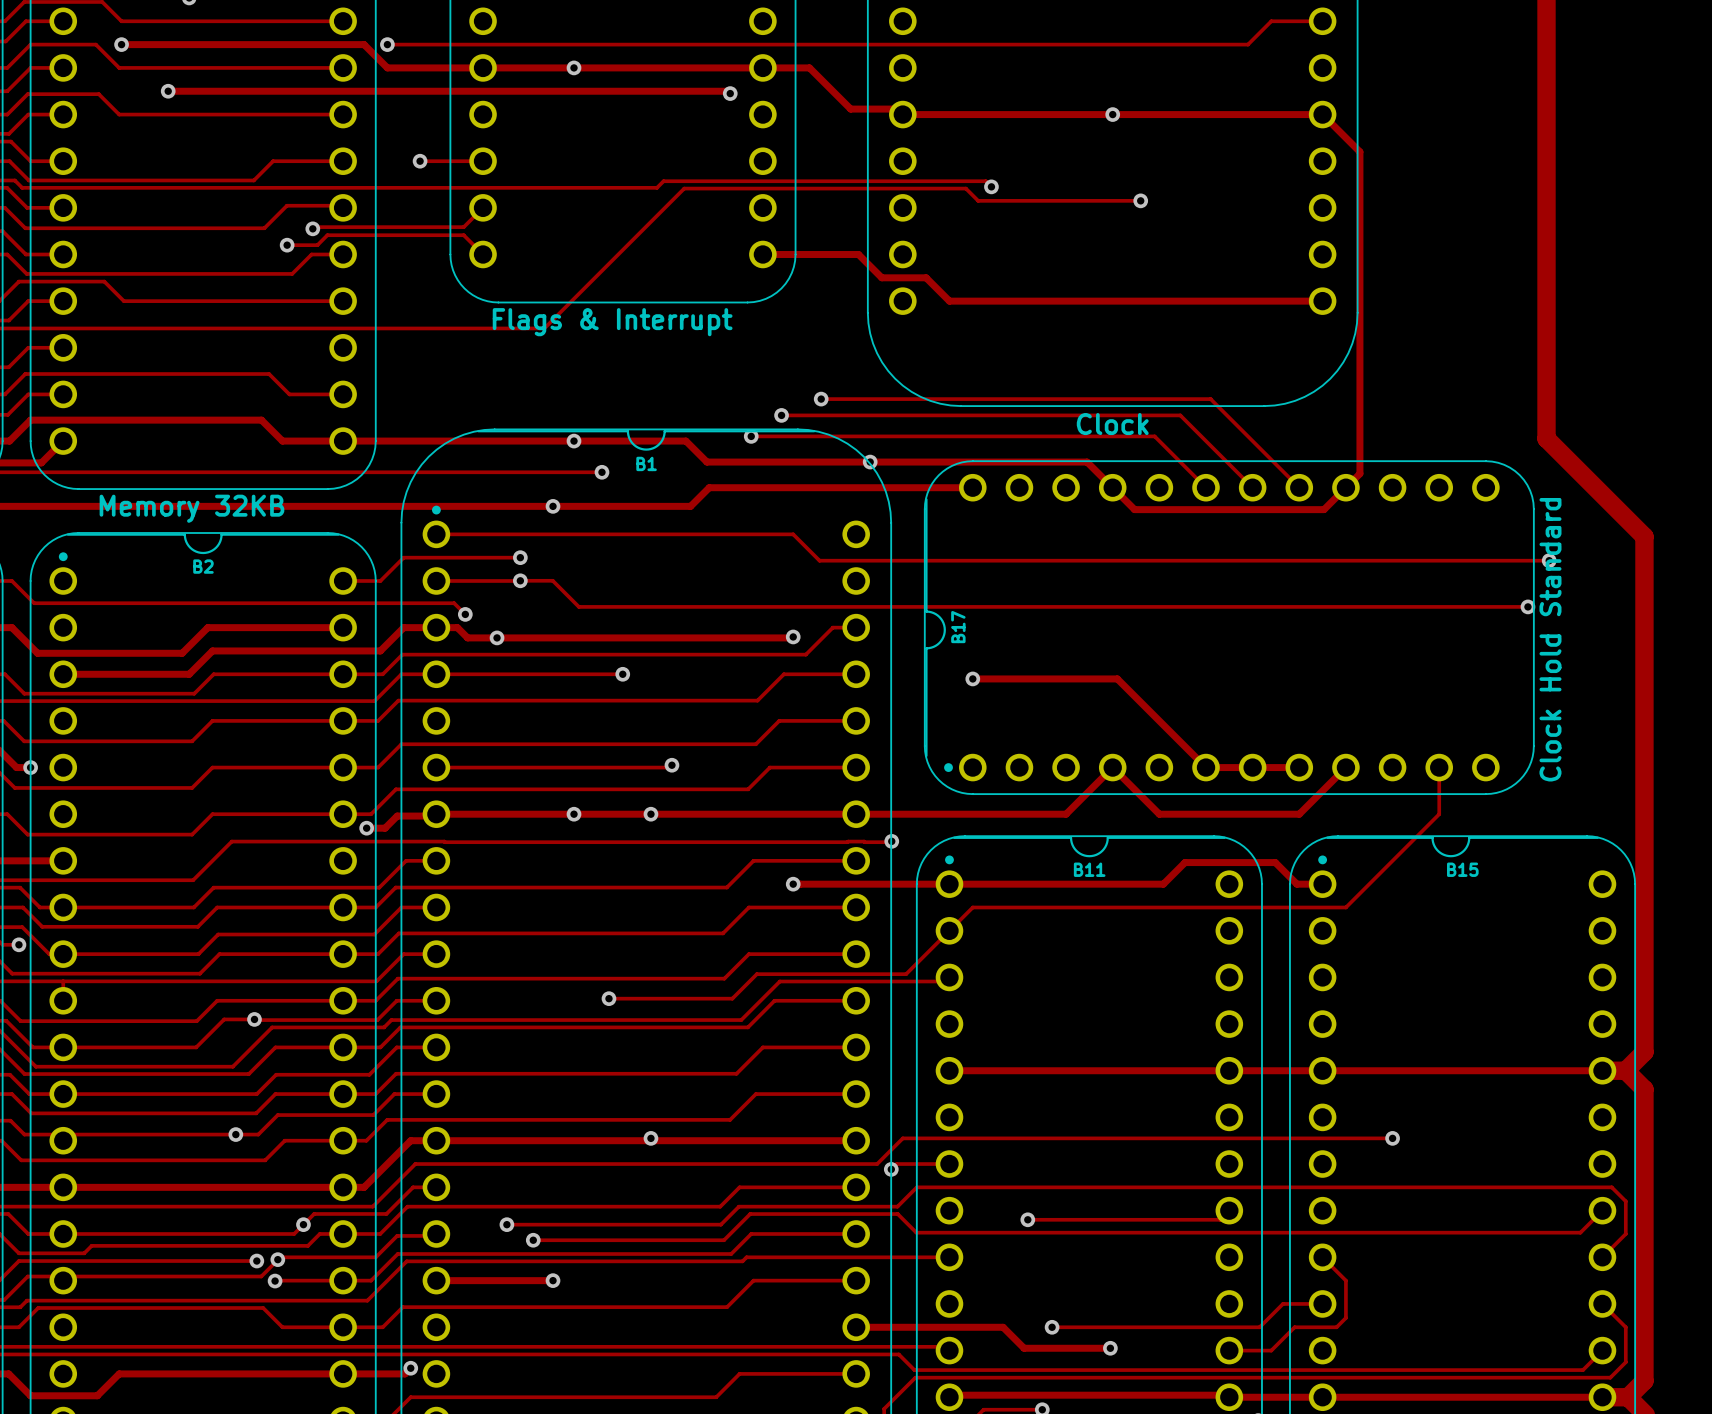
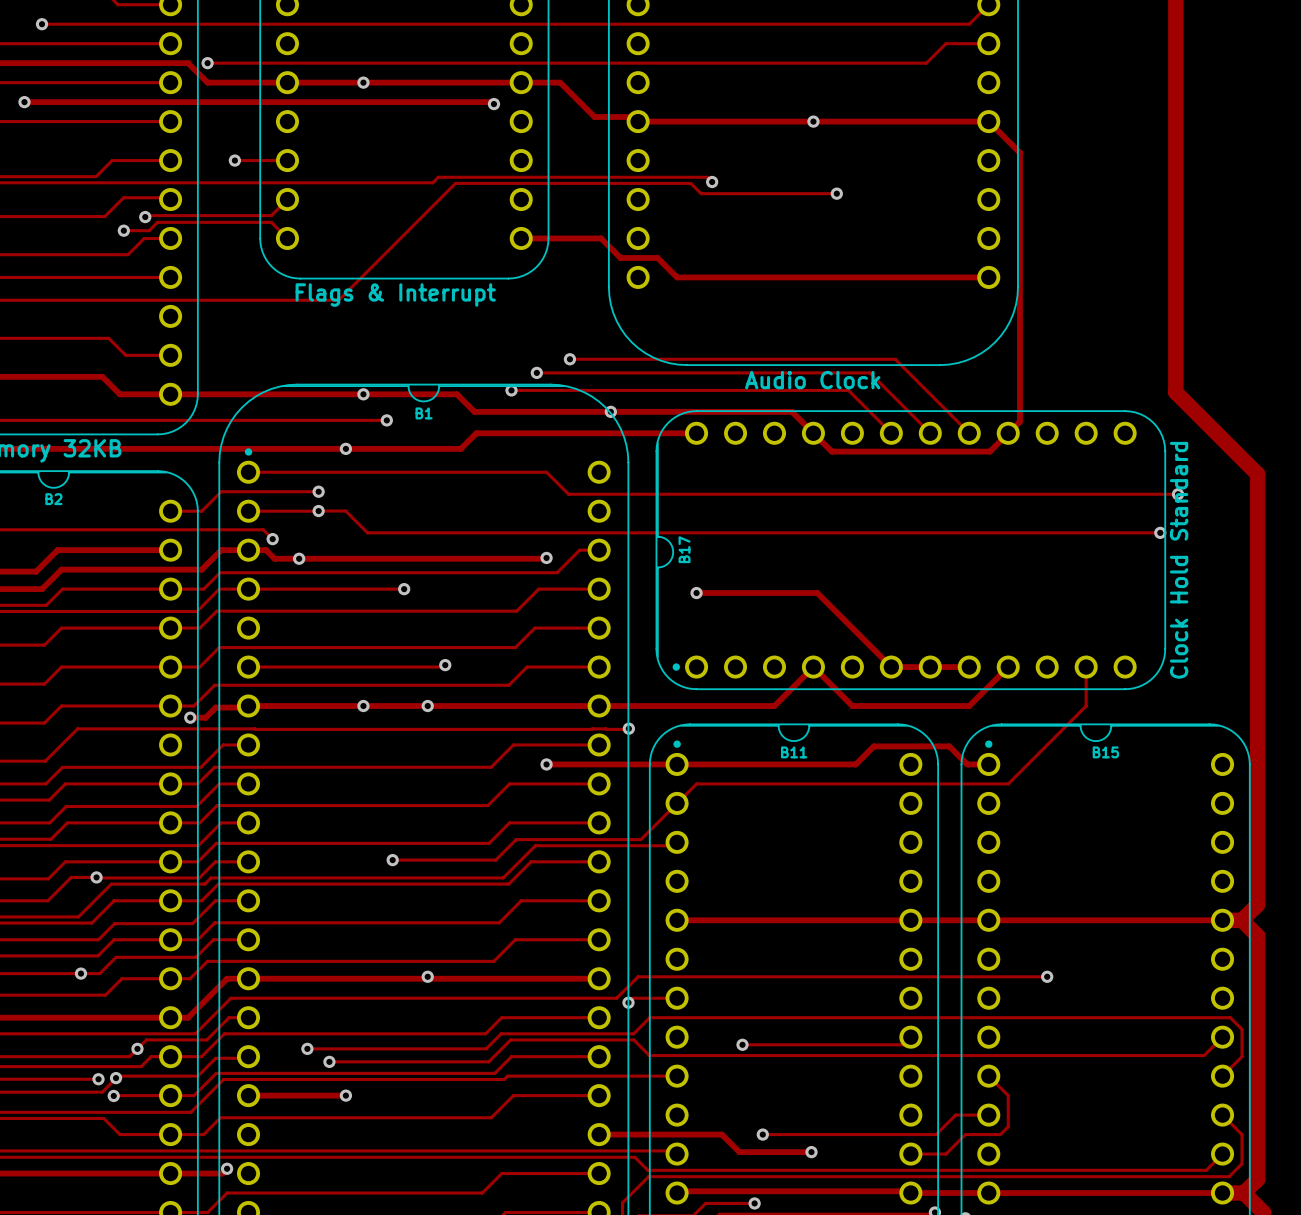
part text: Clock (1112, 424) -> Audio Clock (812, 380)

